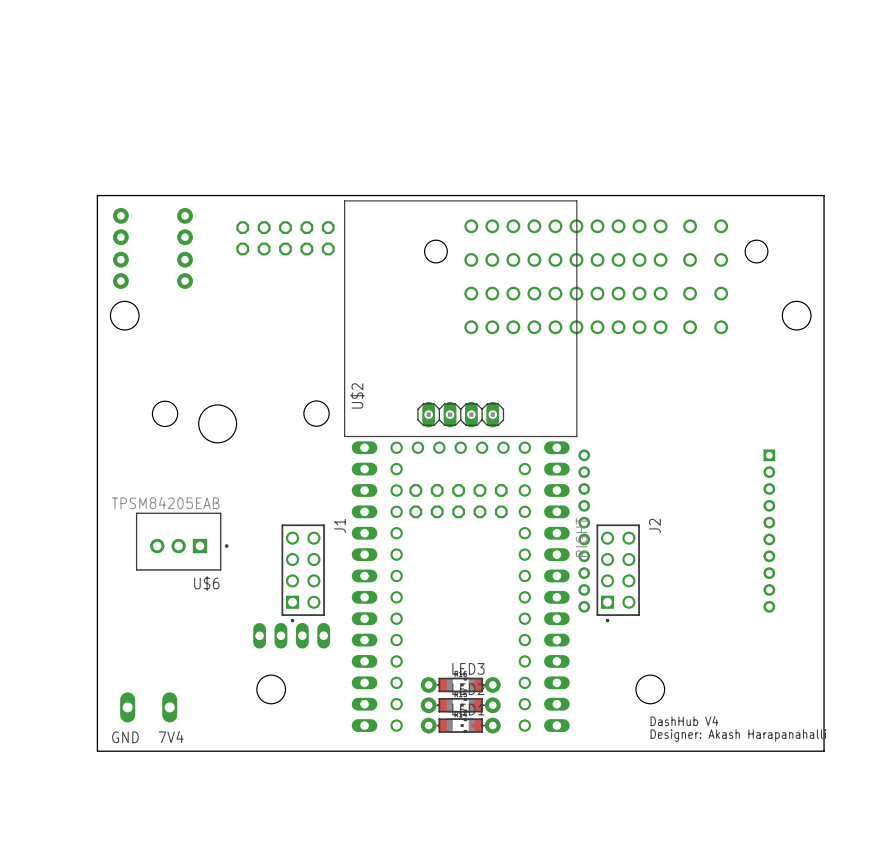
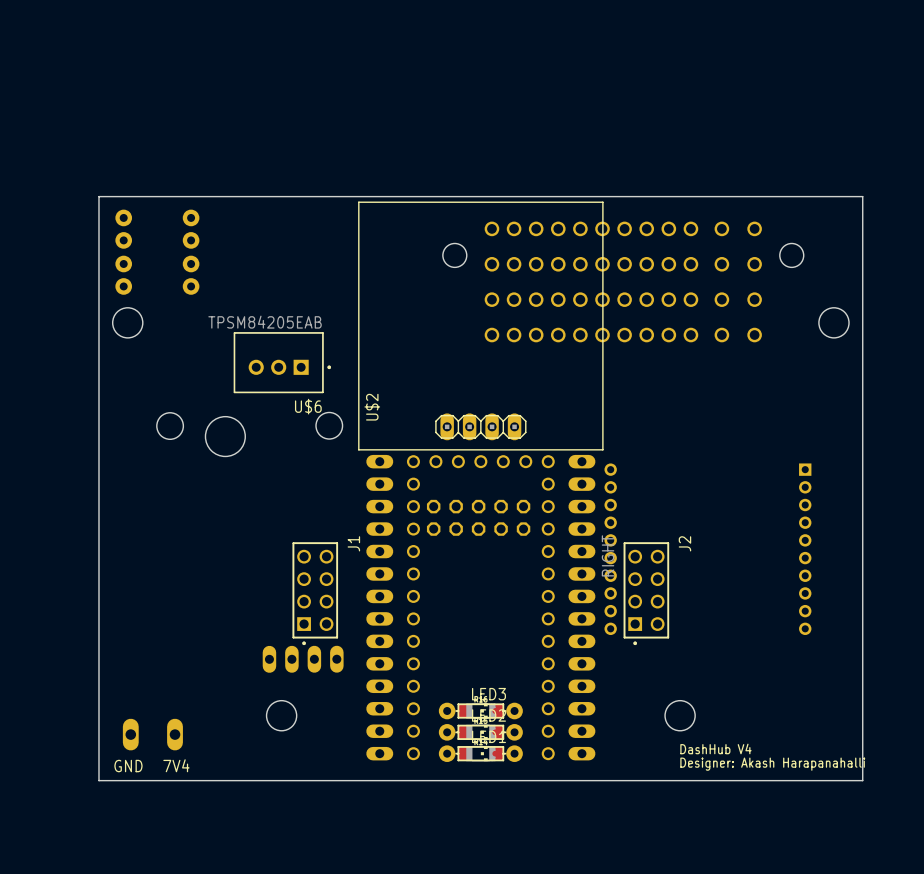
part: (285, 238) -> none
U$6 position: (182, 541) -> (282, 362)

